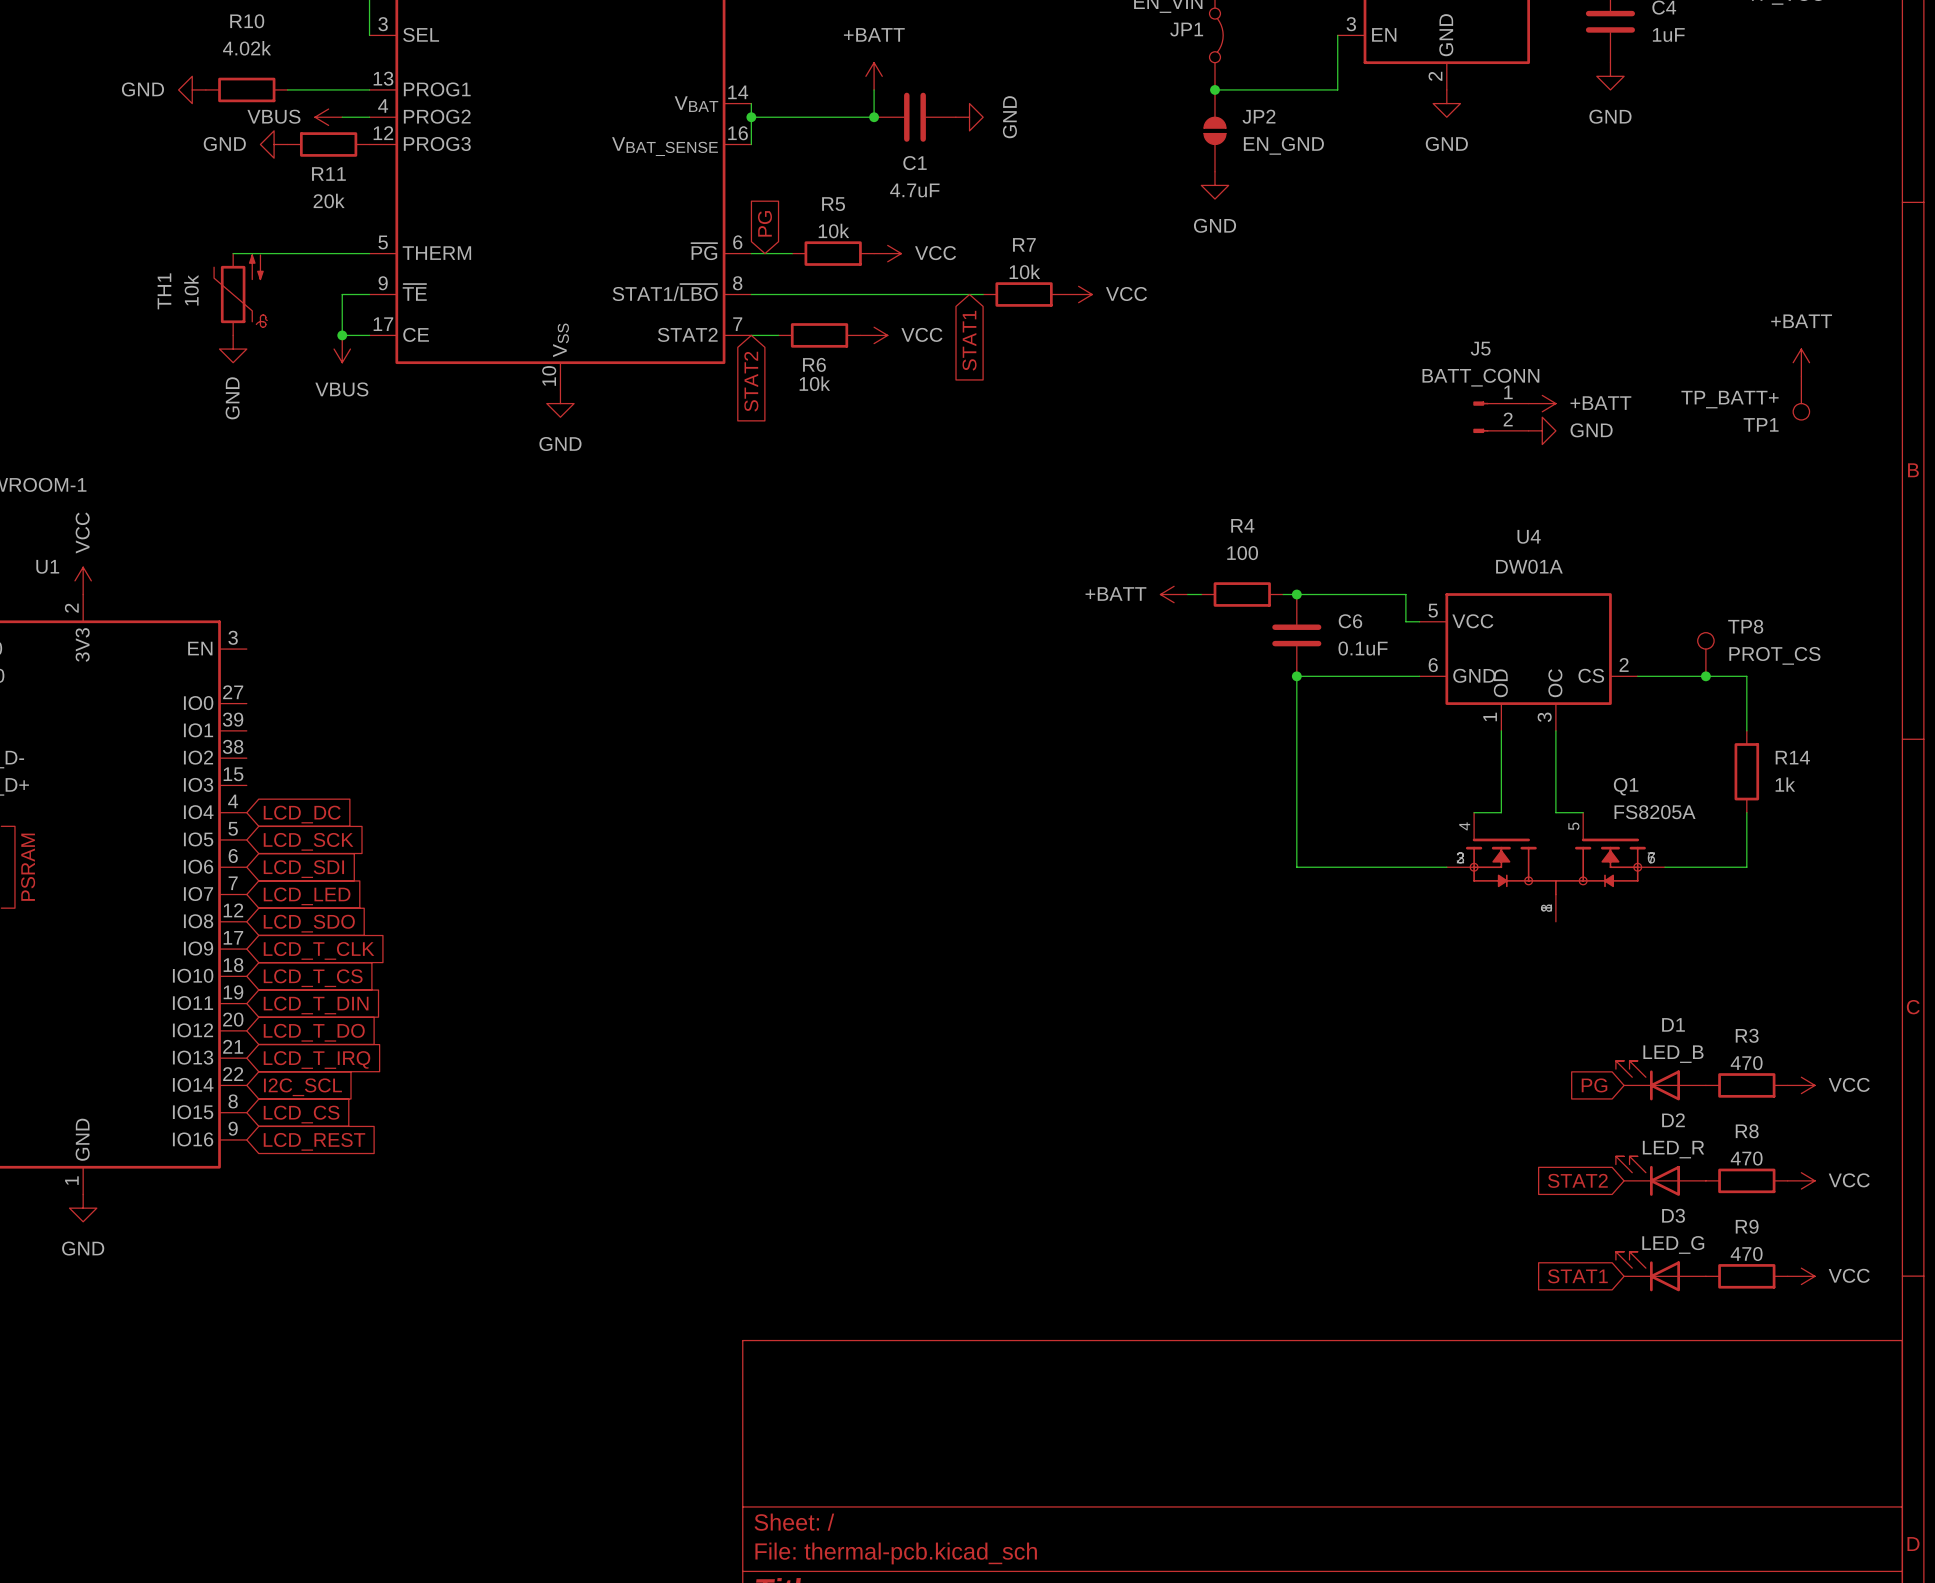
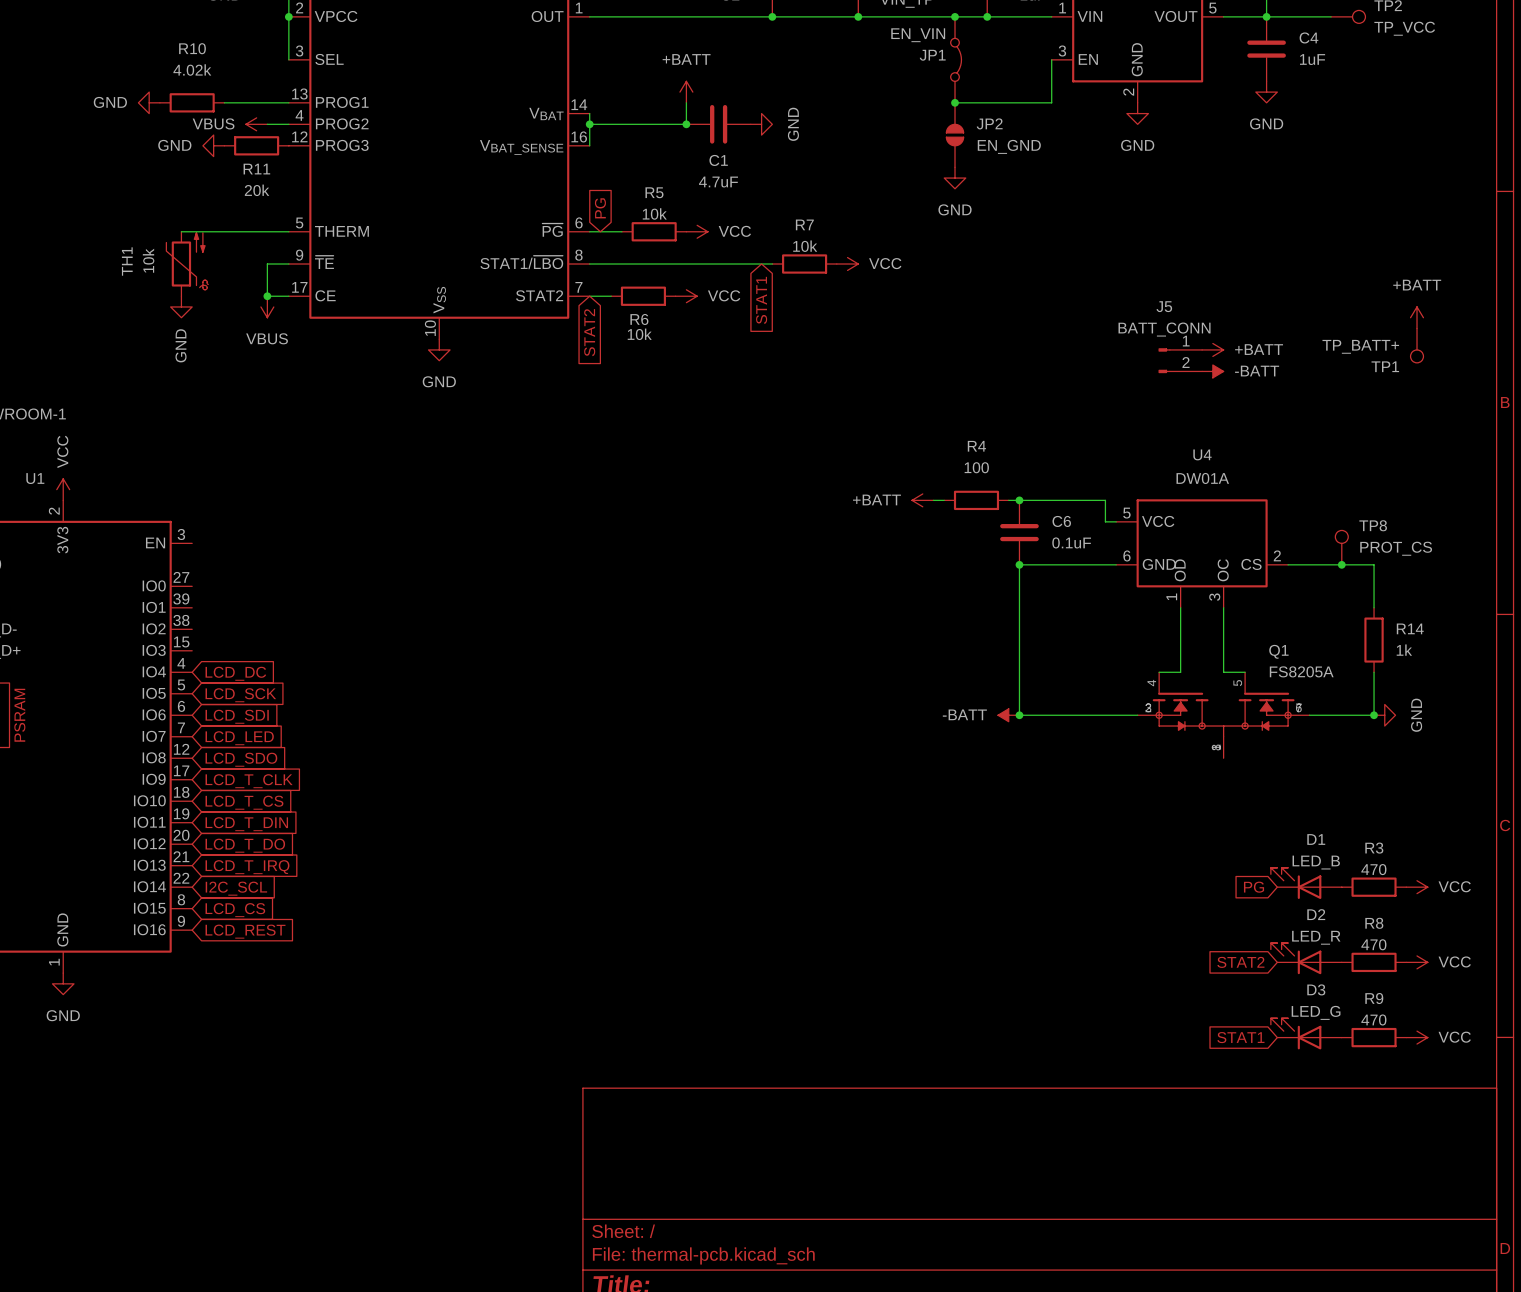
power symbol: GND (1542, 430) -> -BATT (1212, 371)
power symbol: none -> -BATT (1008, 715)
junction: none -> (1019, 715)
junction: none -> (1374, 715)
power symbol: none -> GND (1384, 715)

